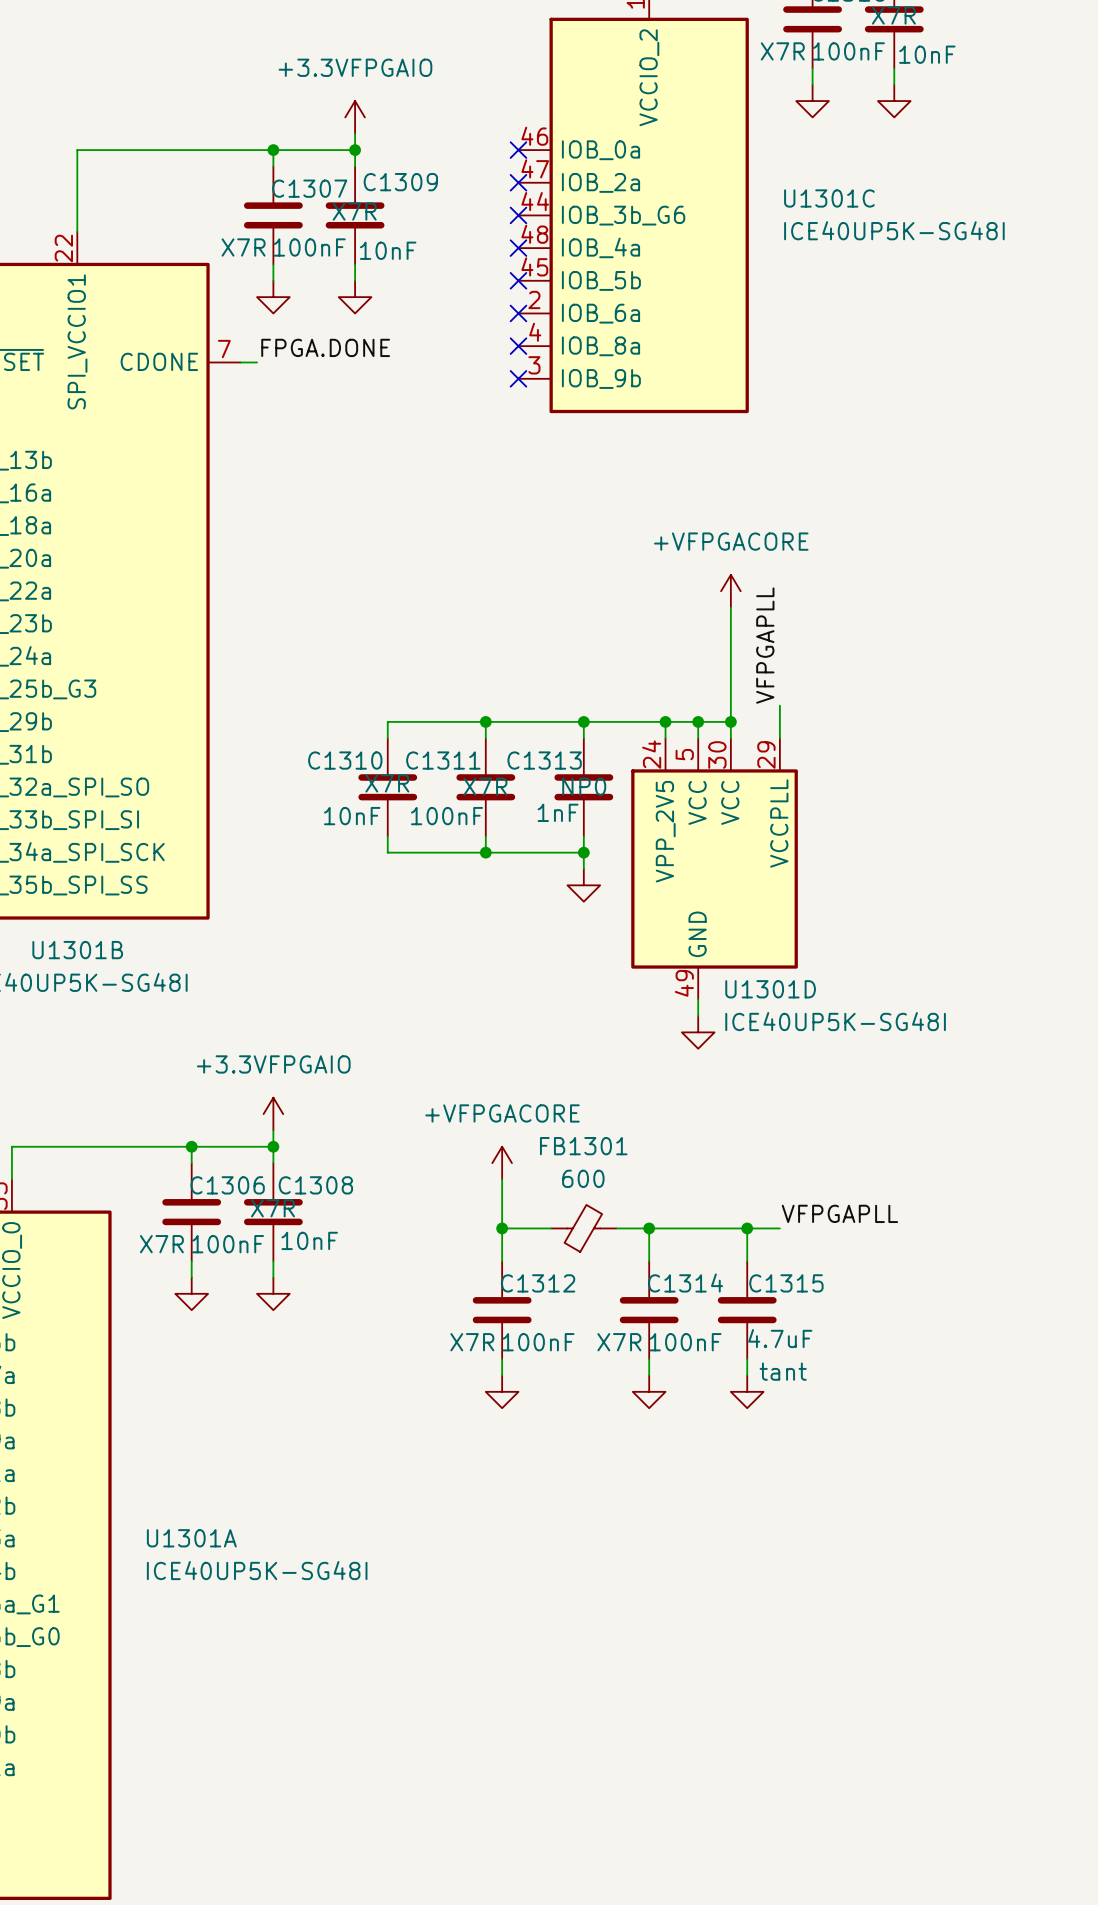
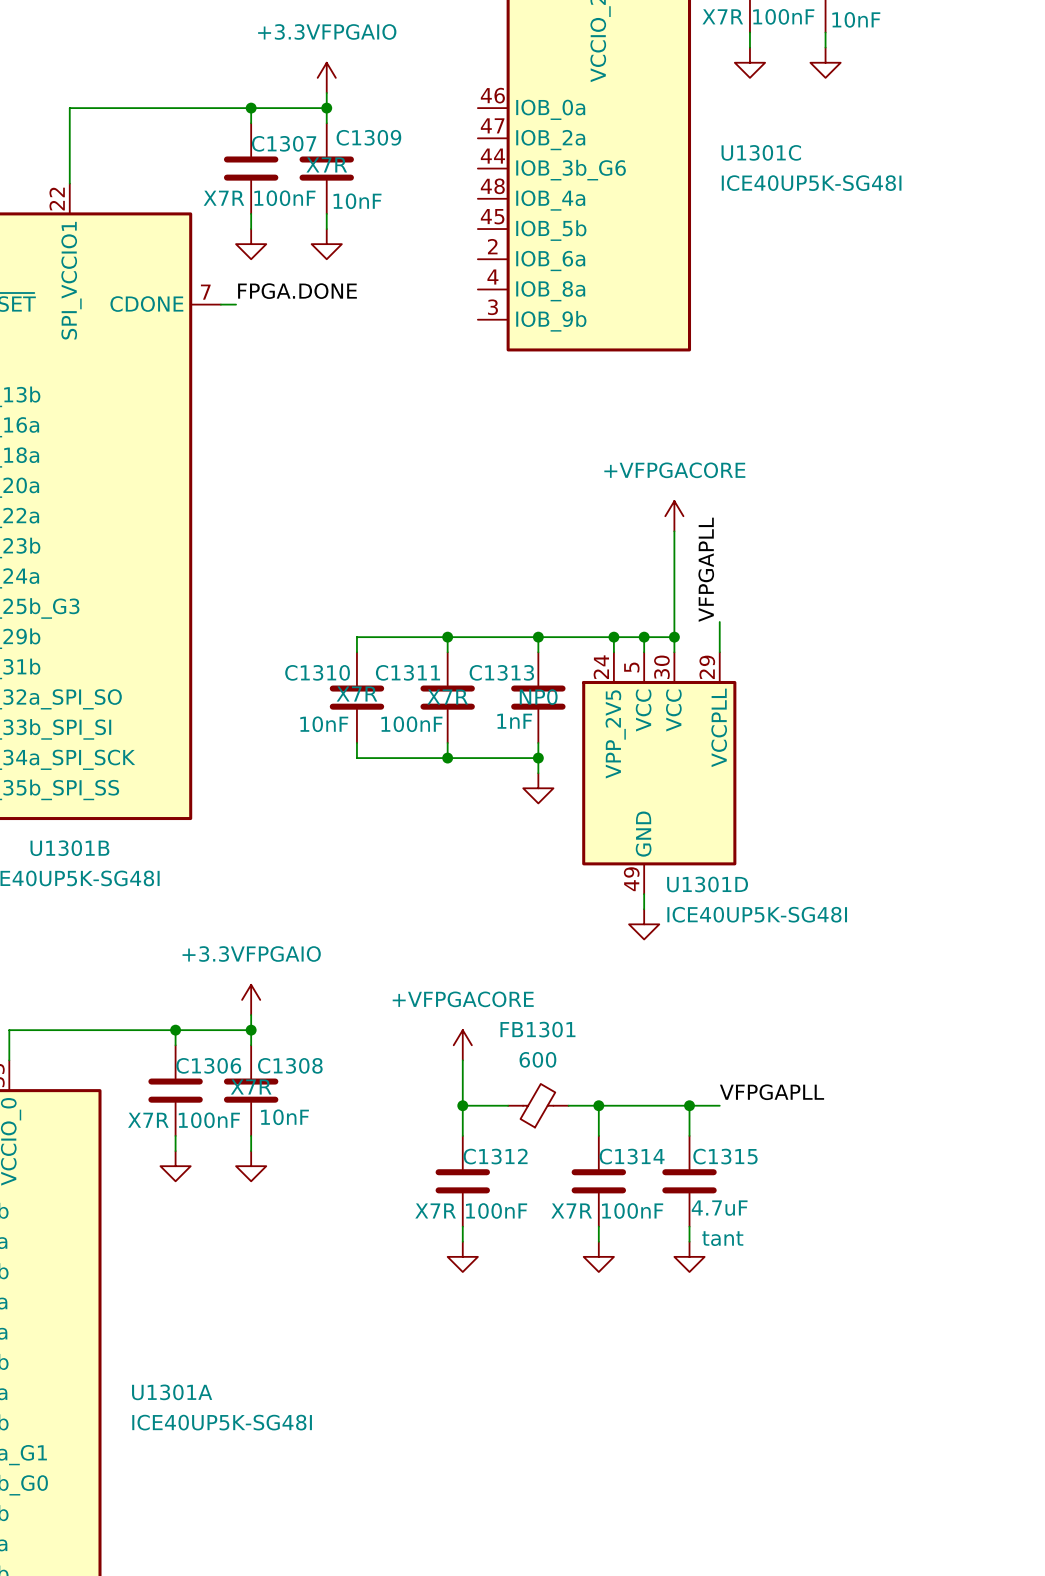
no-connect mark: (518, 150) -> none
no-connect mark: (518, 182) -> none
no-connect mark: (518, 215) -> none
no-connect mark: (518, 248) -> none
no-connect mark: (518, 280) -> none
no-connect mark: (518, 313) -> none
no-connect mark: (518, 346) -> none
no-connect mark: (518, 378) -> none

